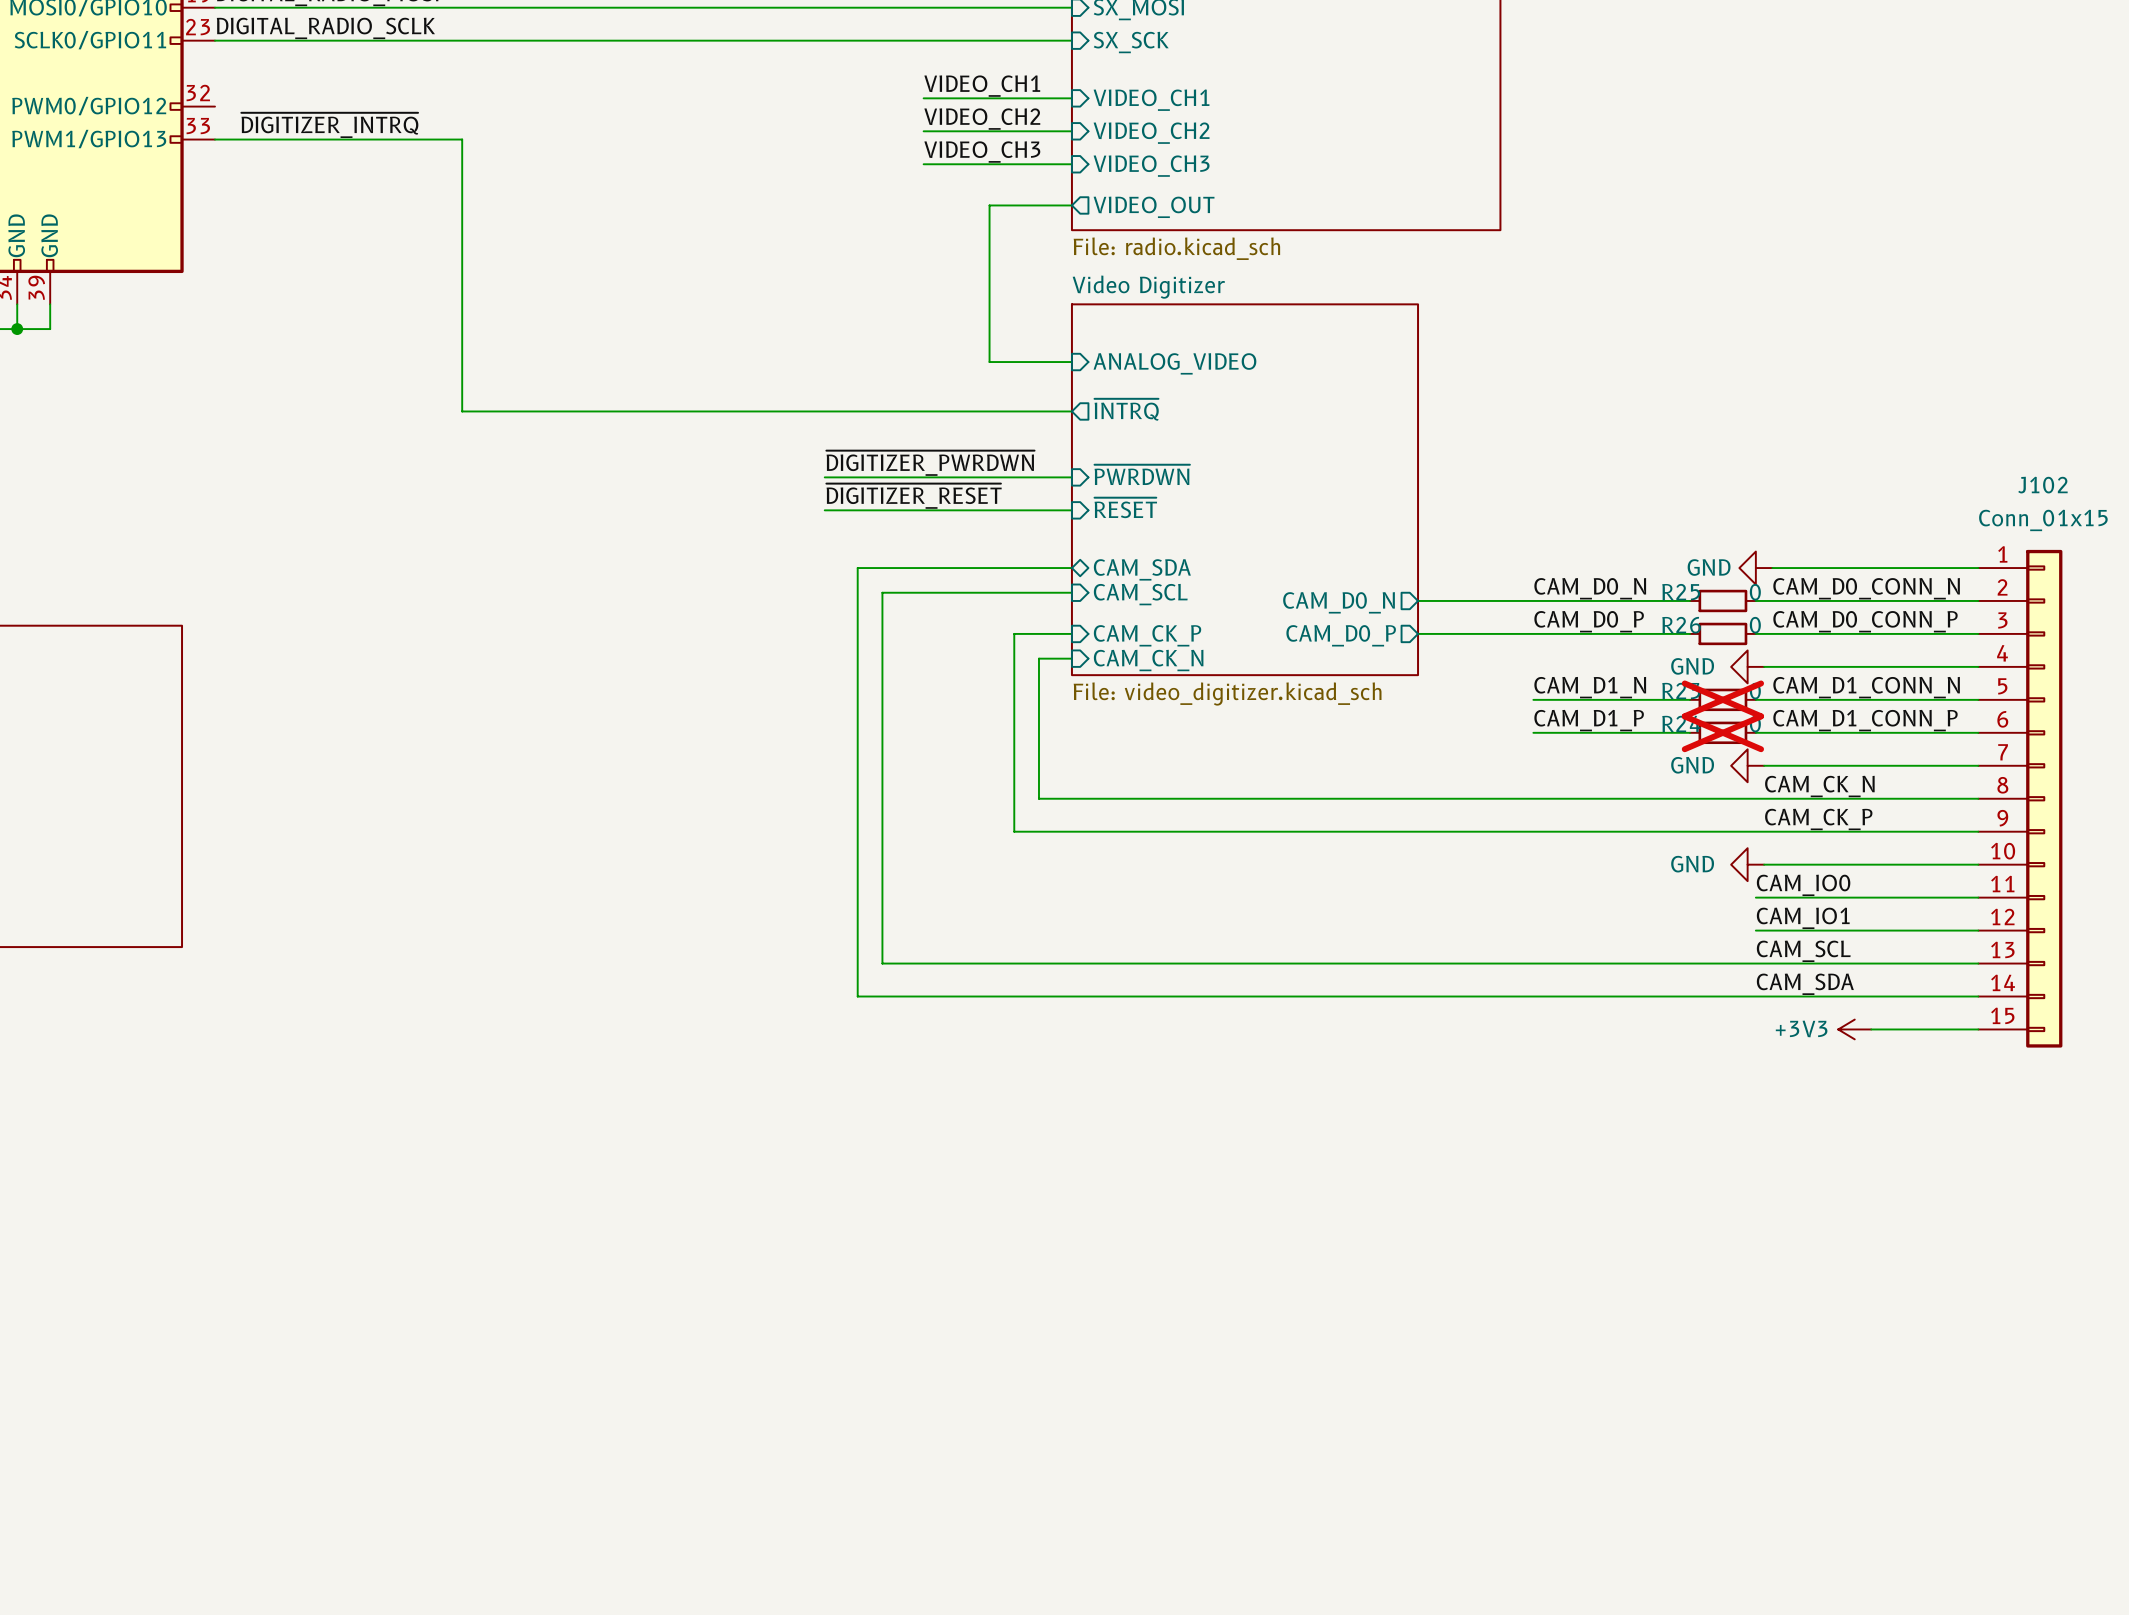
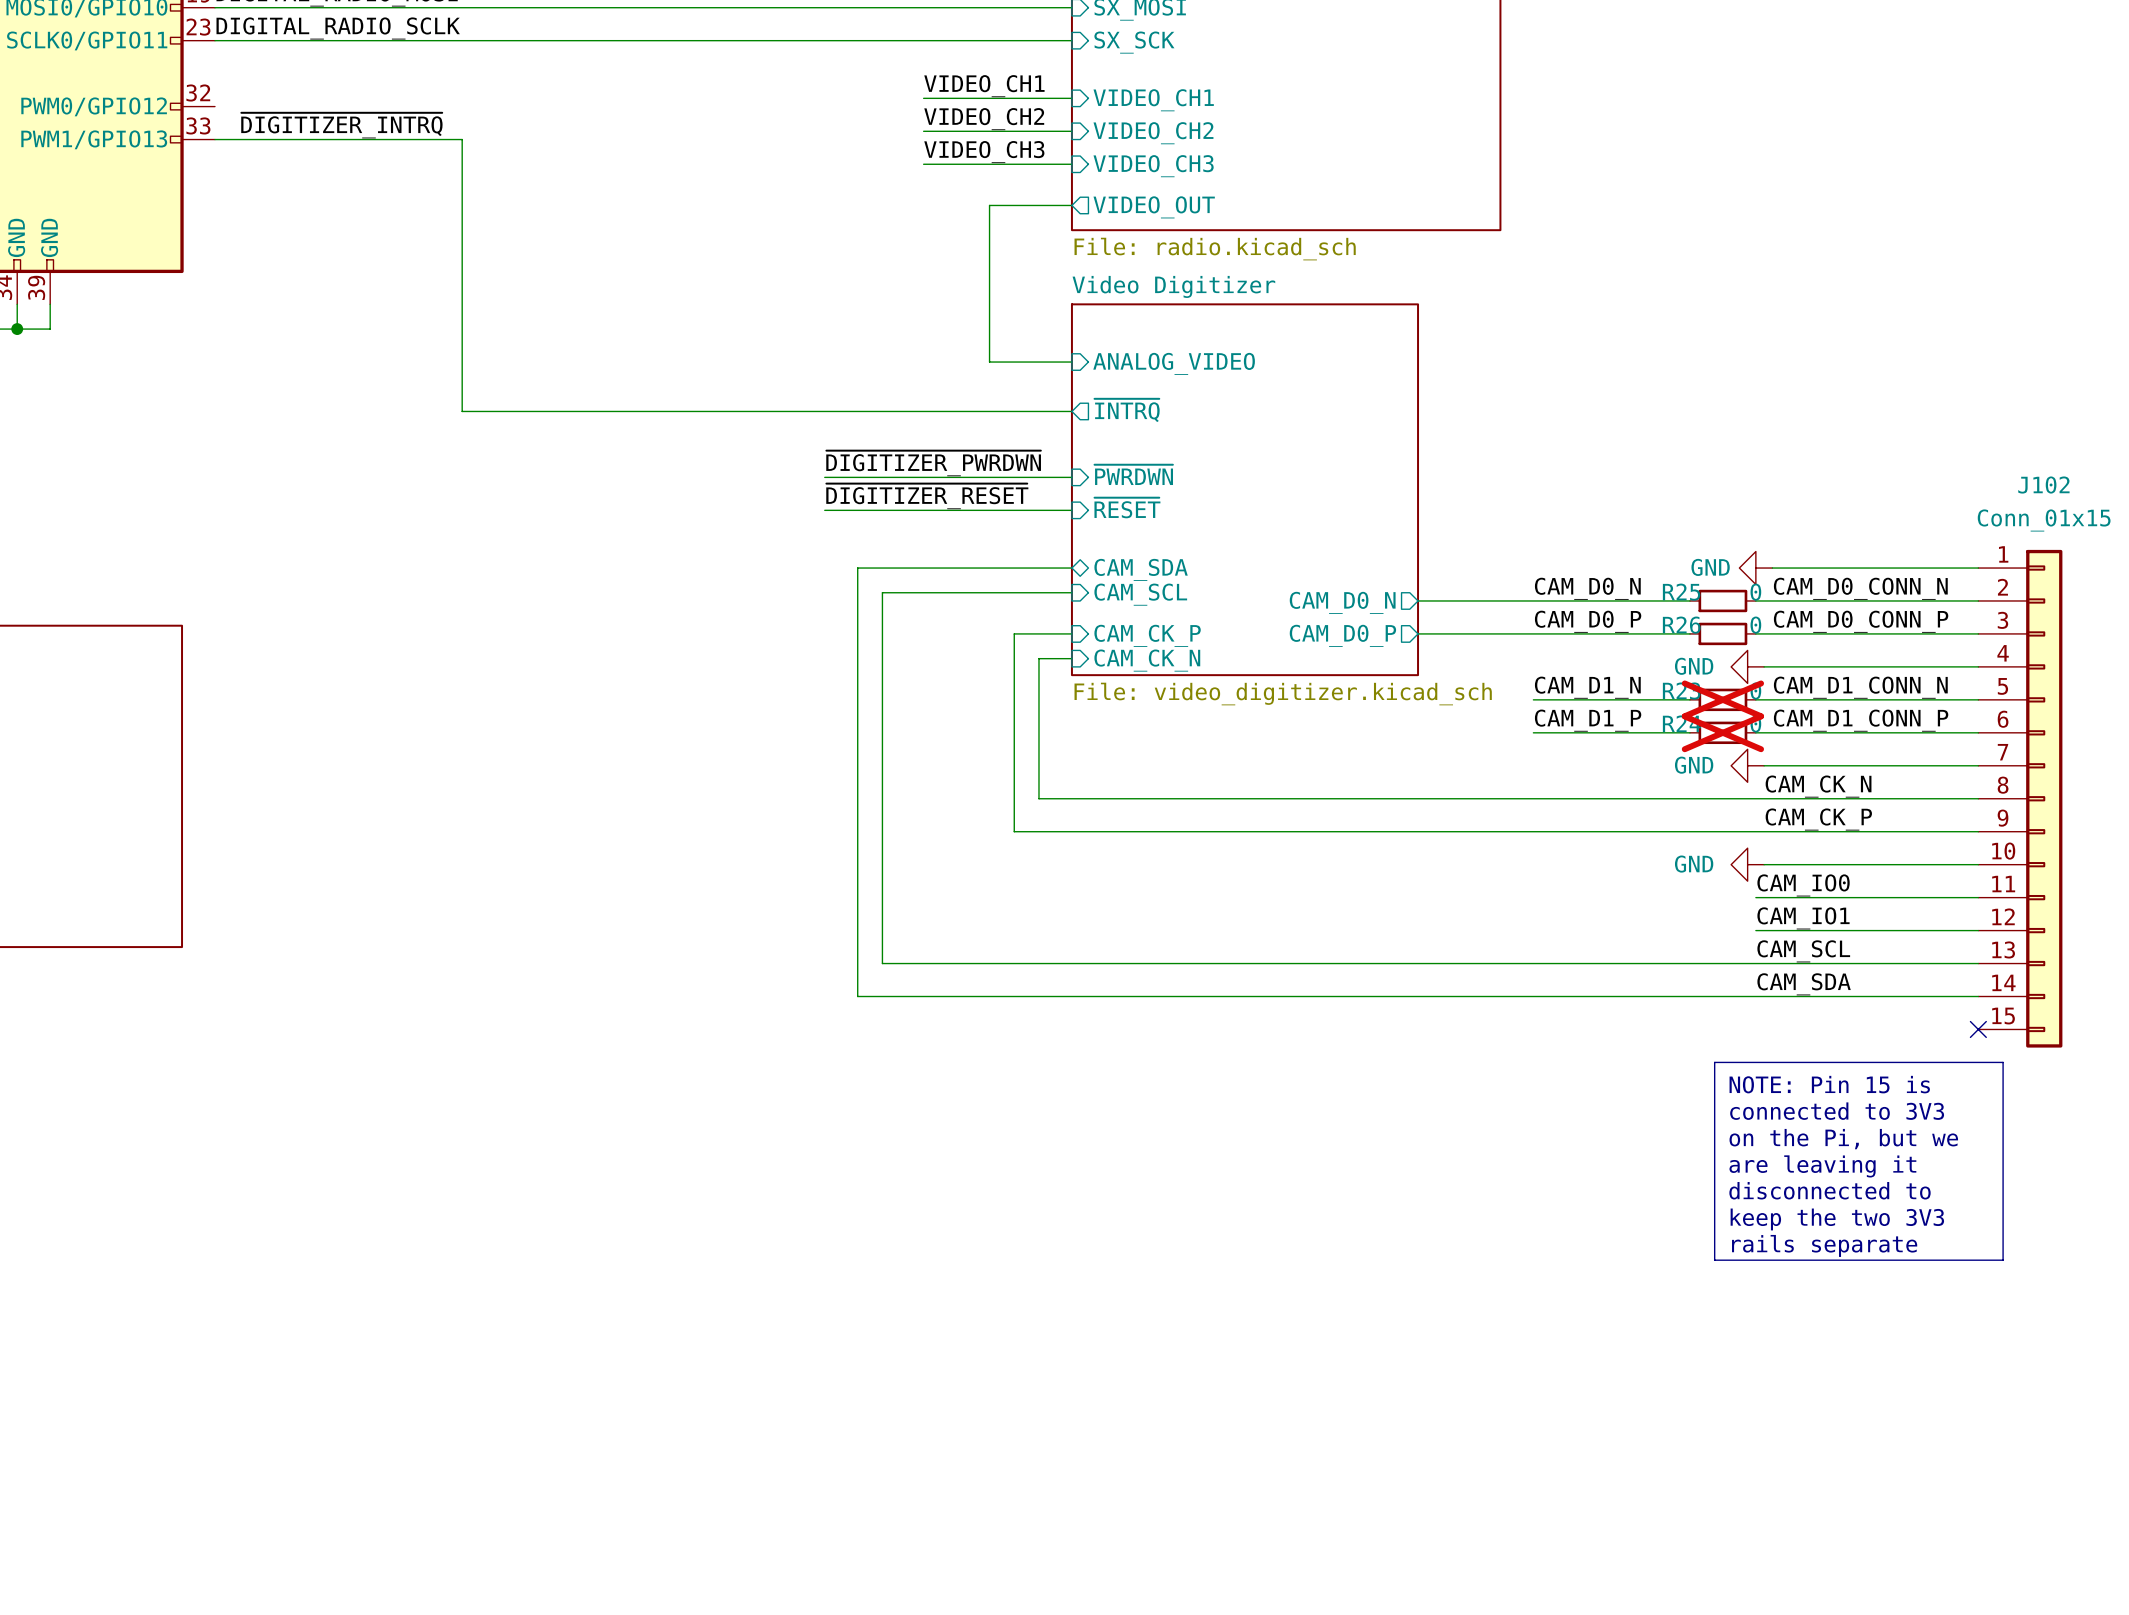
power symbol: +3V3 (1854, 1029) -> none
wire: (1871, 1029) (1978, 1029) -> none
no-connect mark: none -> (1978, 1029)
line: none -> (1714, 1062) (2003, 1062) (2003, 1260) (1714, 1260) (1714, 1062)
text: none -> NOTE: Pin 15 is (1829, 1084)
text: none -> connected to 3V3 (1837, 1111)
text: none -> on the Pi, but we (1843, 1139)
text: none -> are leaving it (1822, 1166)
text: none -> disconnected to (1830, 1190)
text: none -> keep the two 3V3 (1837, 1219)
text: none -> rails separate (1824, 1245)

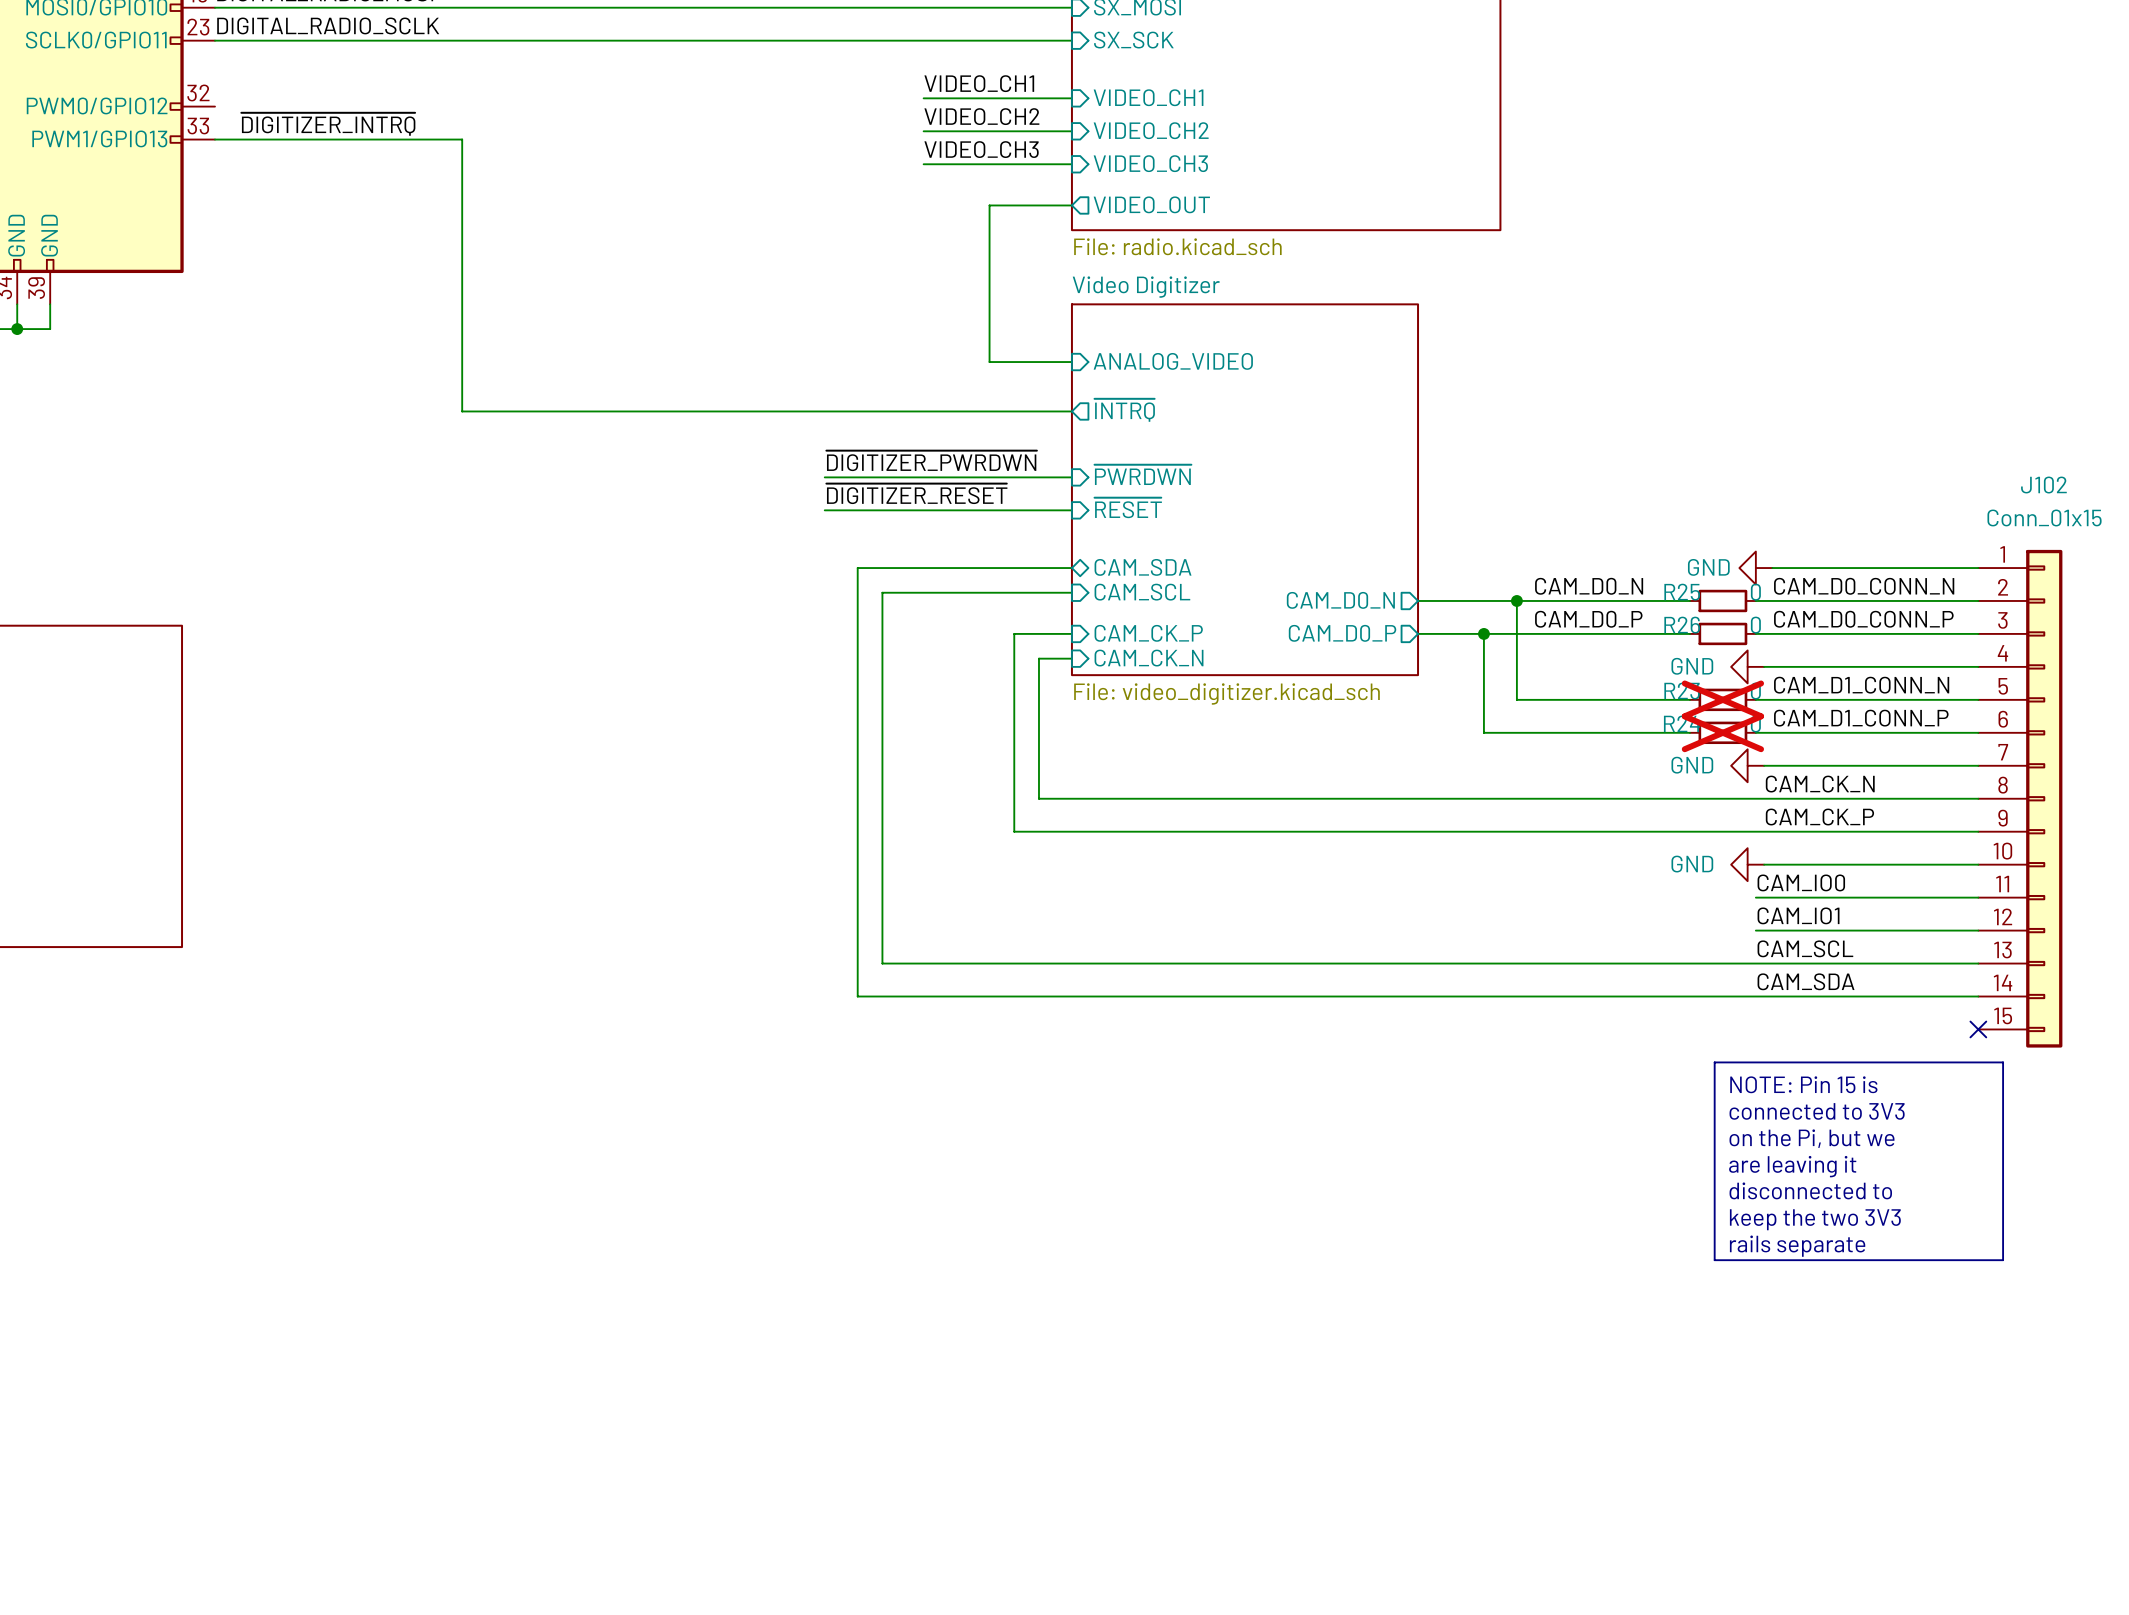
wire: none -> (1516, 600) (1516, 699) (1533, 699)
junction: none -> (1516, 600)
wire: none -> (1483, 633) (1483, 732) (1533, 732)
junction: none -> (1483, 633)
label: CAM_D1_N (1587, 687) -> none
label: CAM_D1_P (1588, 720) -> none

